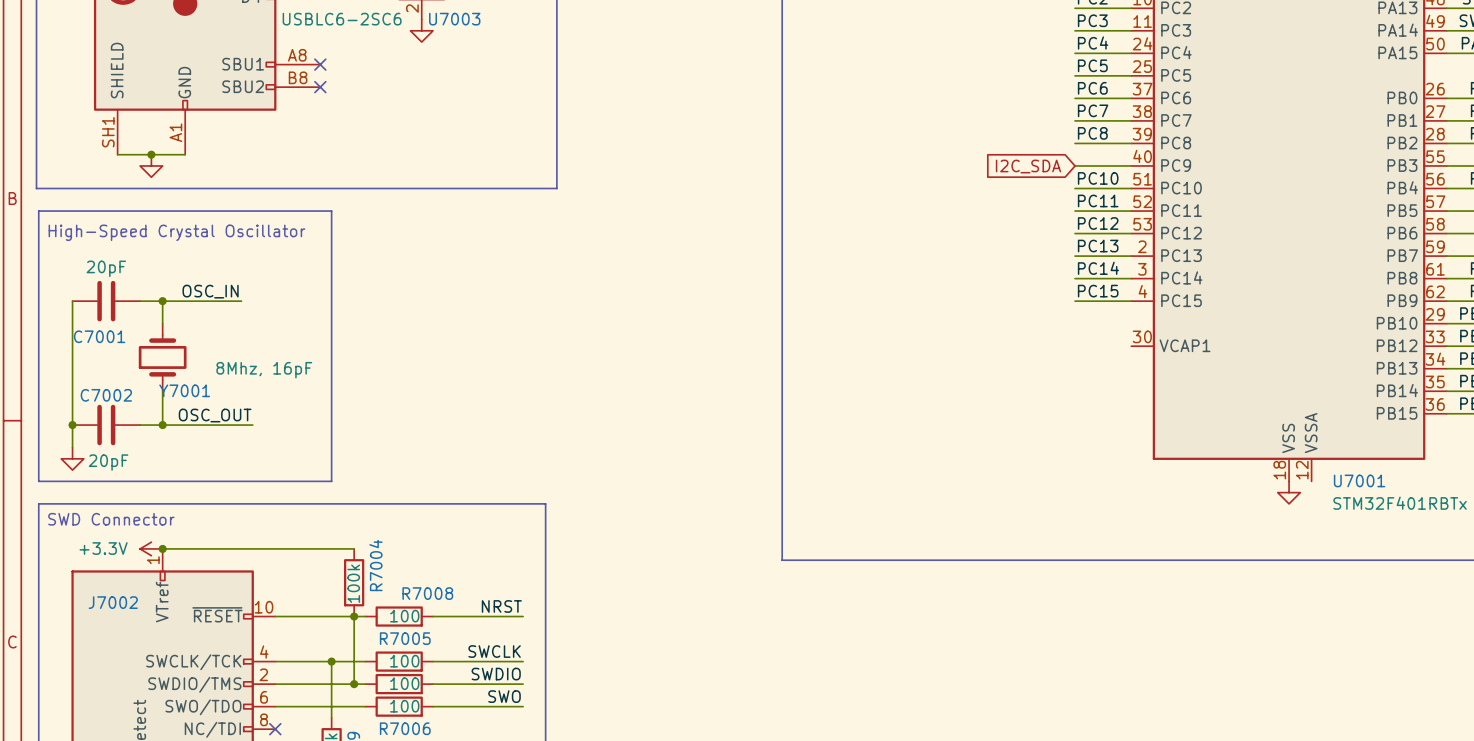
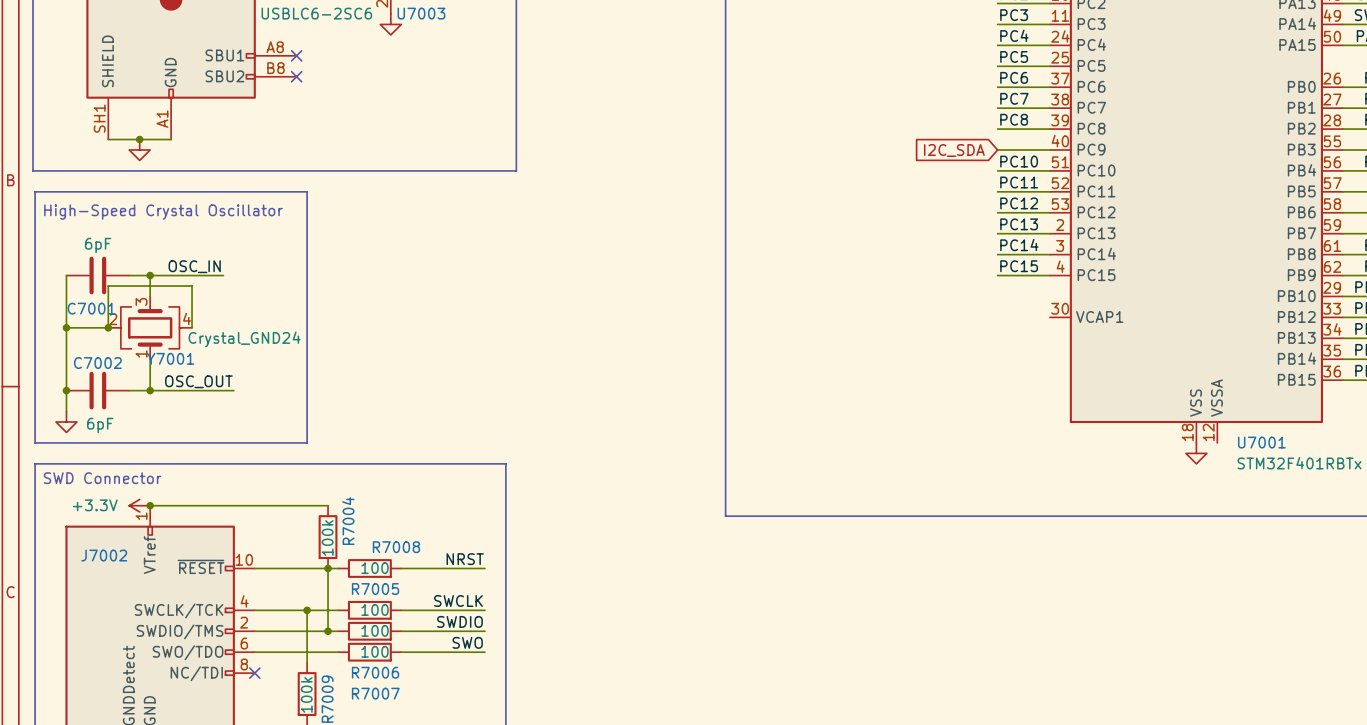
C7001 value: 20pF (106, 268) -> 6pF (98, 245)
Y7001 symbol: [138, 323, 187, 392] -> [108, 296, 193, 360]
wire: none -> (66, 327) (108, 327) (108, 286) (192, 286) (192, 327)
junction: none -> (66, 327)
junction: none -> (108, 327)
Y7001 value: 8Mhz, 16pF (264, 370) -> Crystal_GND24 (244, 339)
C7002 value: 20pF (108, 462) -> 6pF (100, 425)

